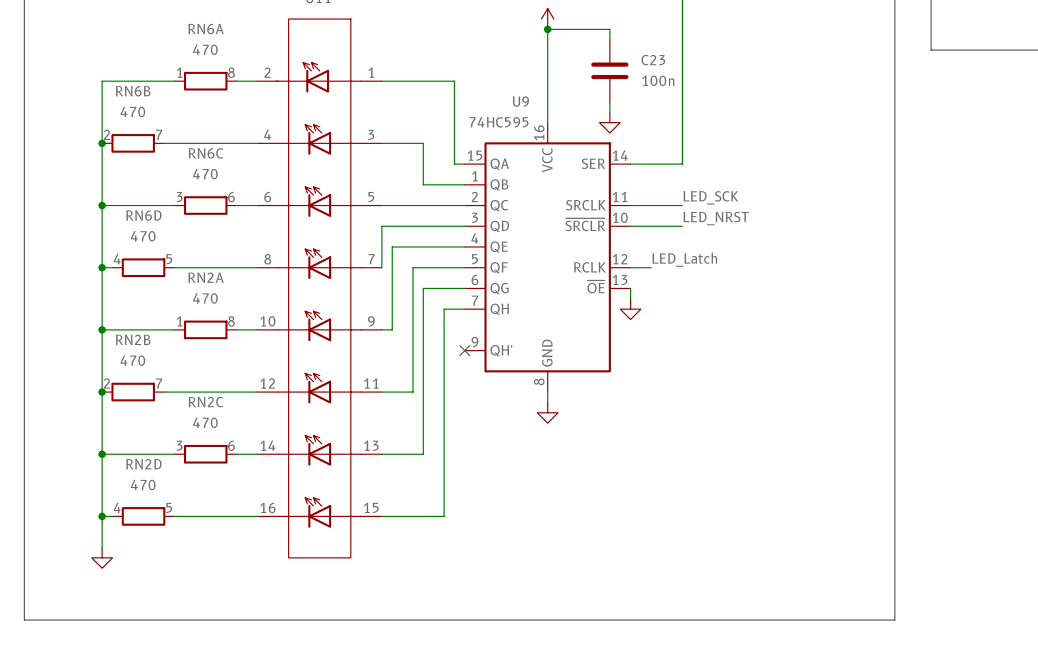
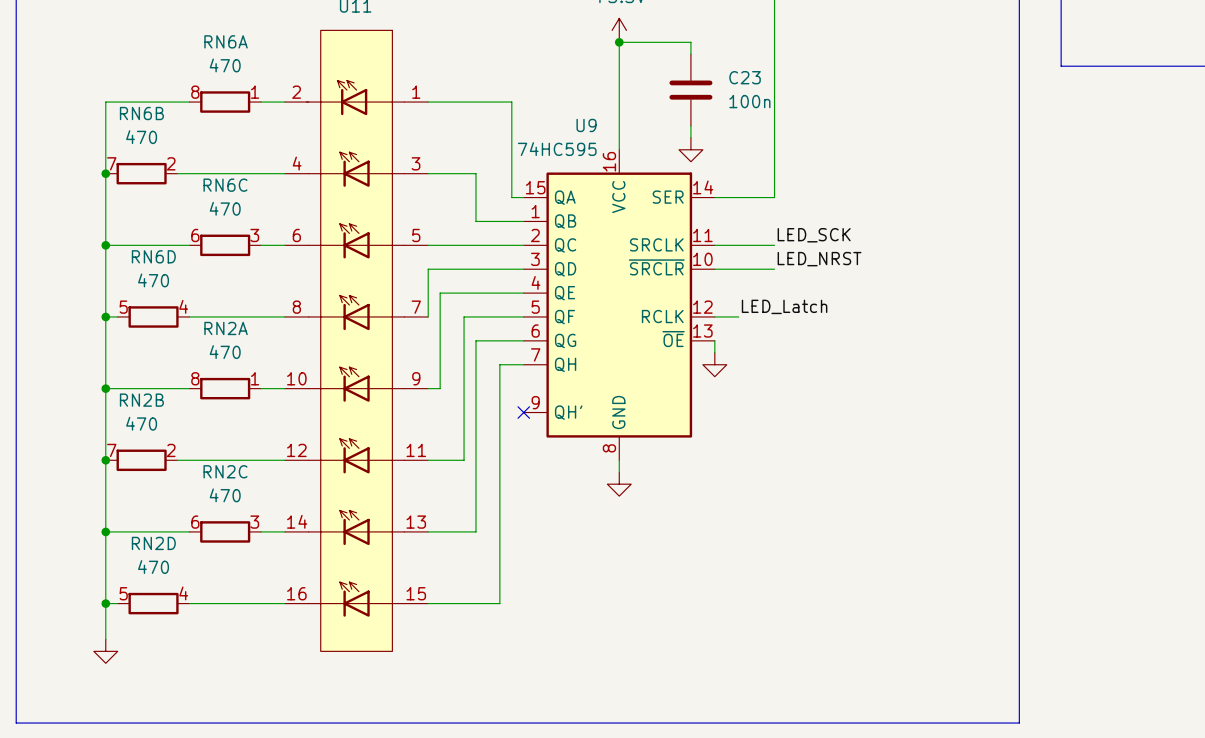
RN6A rotation: 0° (205, 81) -> 180° (225, 102)
RN6B rotation: 0° (133, 143) -> 180° (141, 173)
RN6C rotation: 0° (205, 205) -> 180° (225, 245)
RN6D rotation: 0° (143, 267) -> 180° (153, 316)
RN2A rotation: 0° (205, 329) -> 180° (225, 388)
RN2B rotation: 0° (133, 392) -> 180° (141, 460)
RN2C rotation: 0° (205, 454) -> 180° (225, 531)
RN2D rotation: 0° (143, 516) -> 180° (153, 603)

